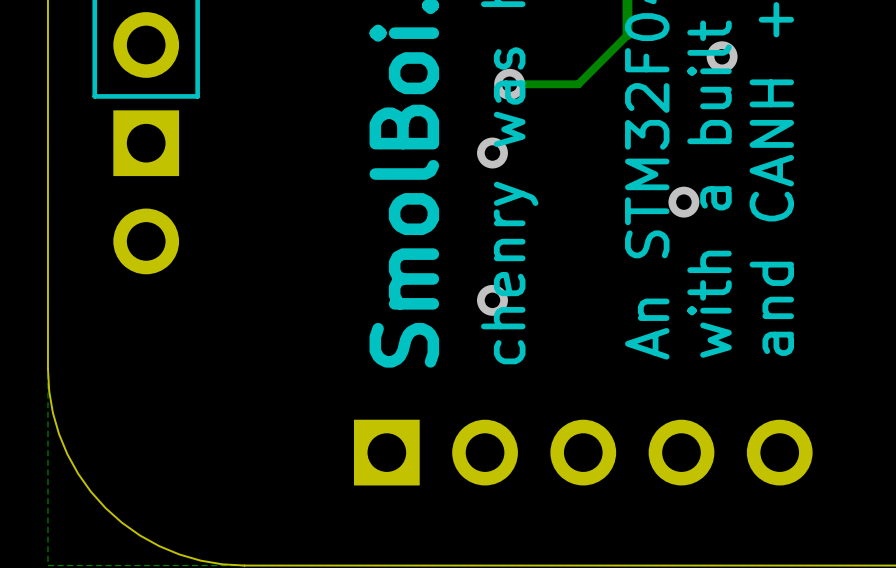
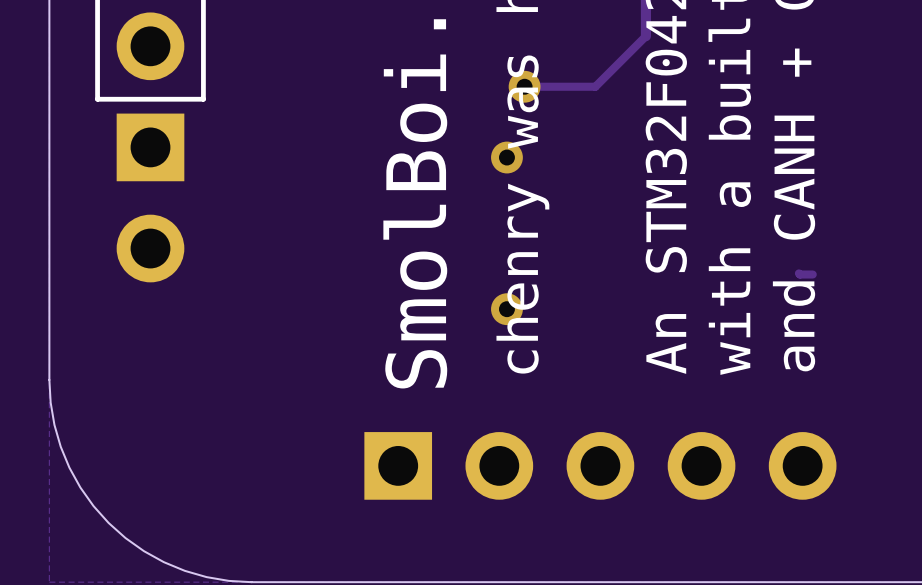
via: (722, 56) -> none
via: (683, 202) -> none
track: none -> (798, 273) (812, 274)

